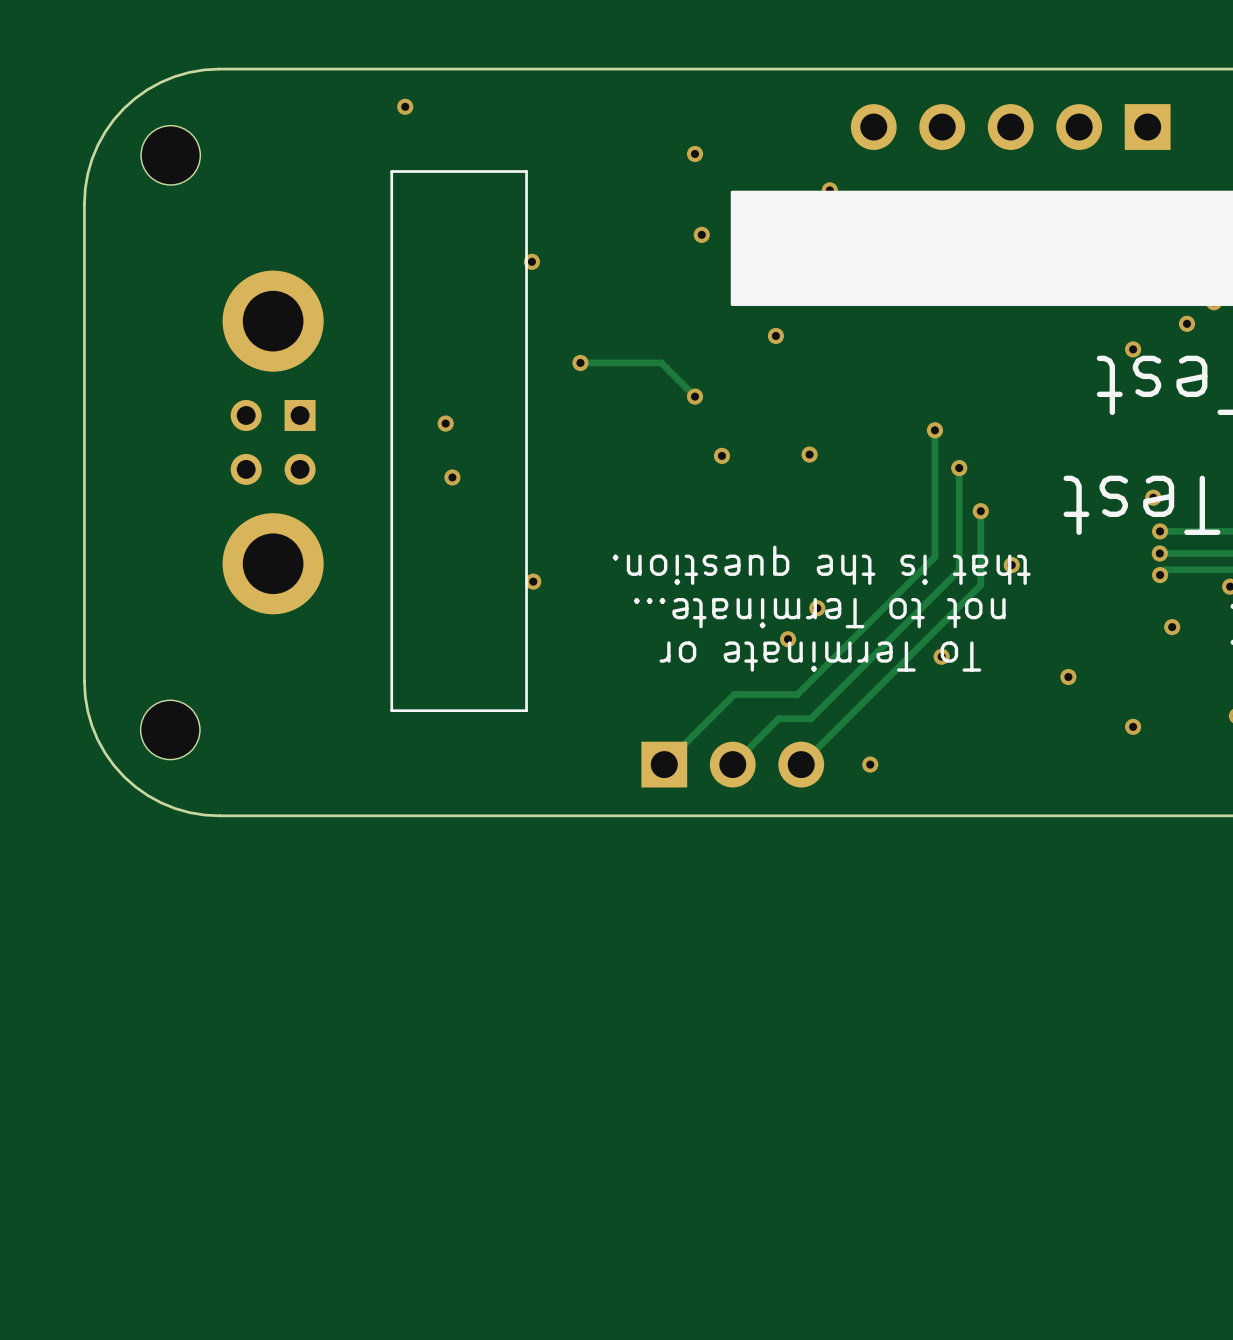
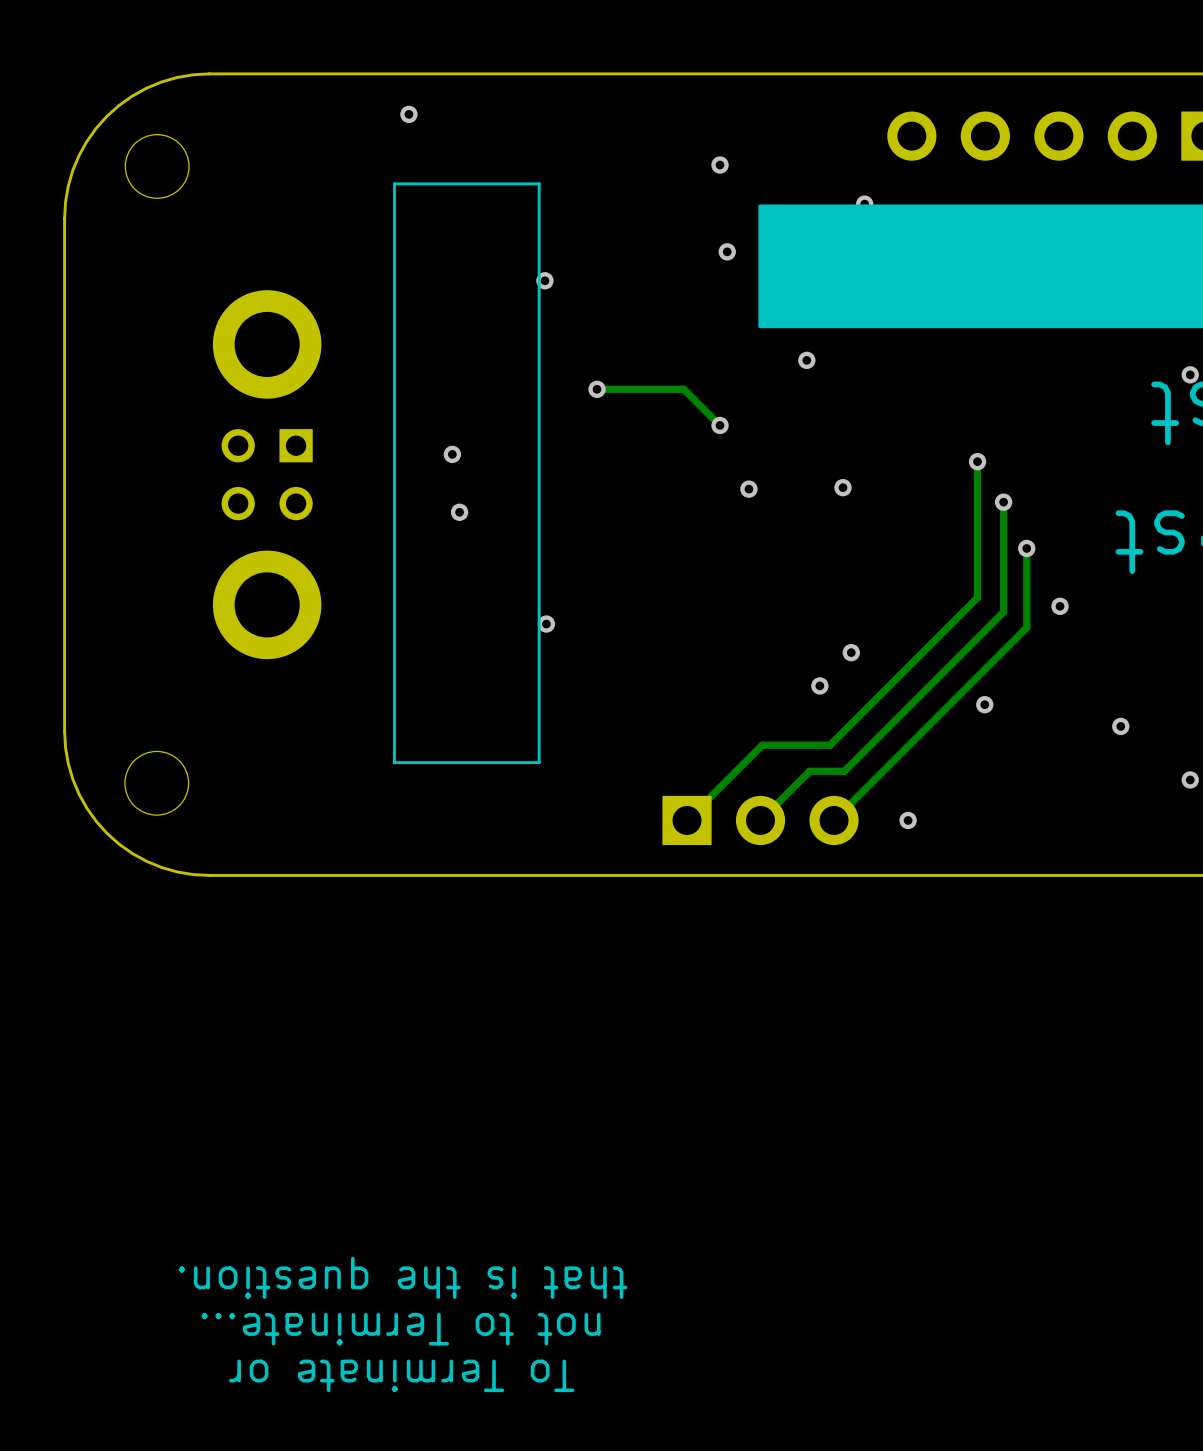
text: that is the question. (821, 565) -> none
text: not to Terminate... (819, 613) -> none
text: To Terminate or (820, 656) -> none
text: none -> that is the question. (403, 1277)
text: none -> not to Terminate... (401, 1329)
text: none -> To Terminate or (401, 1375)

